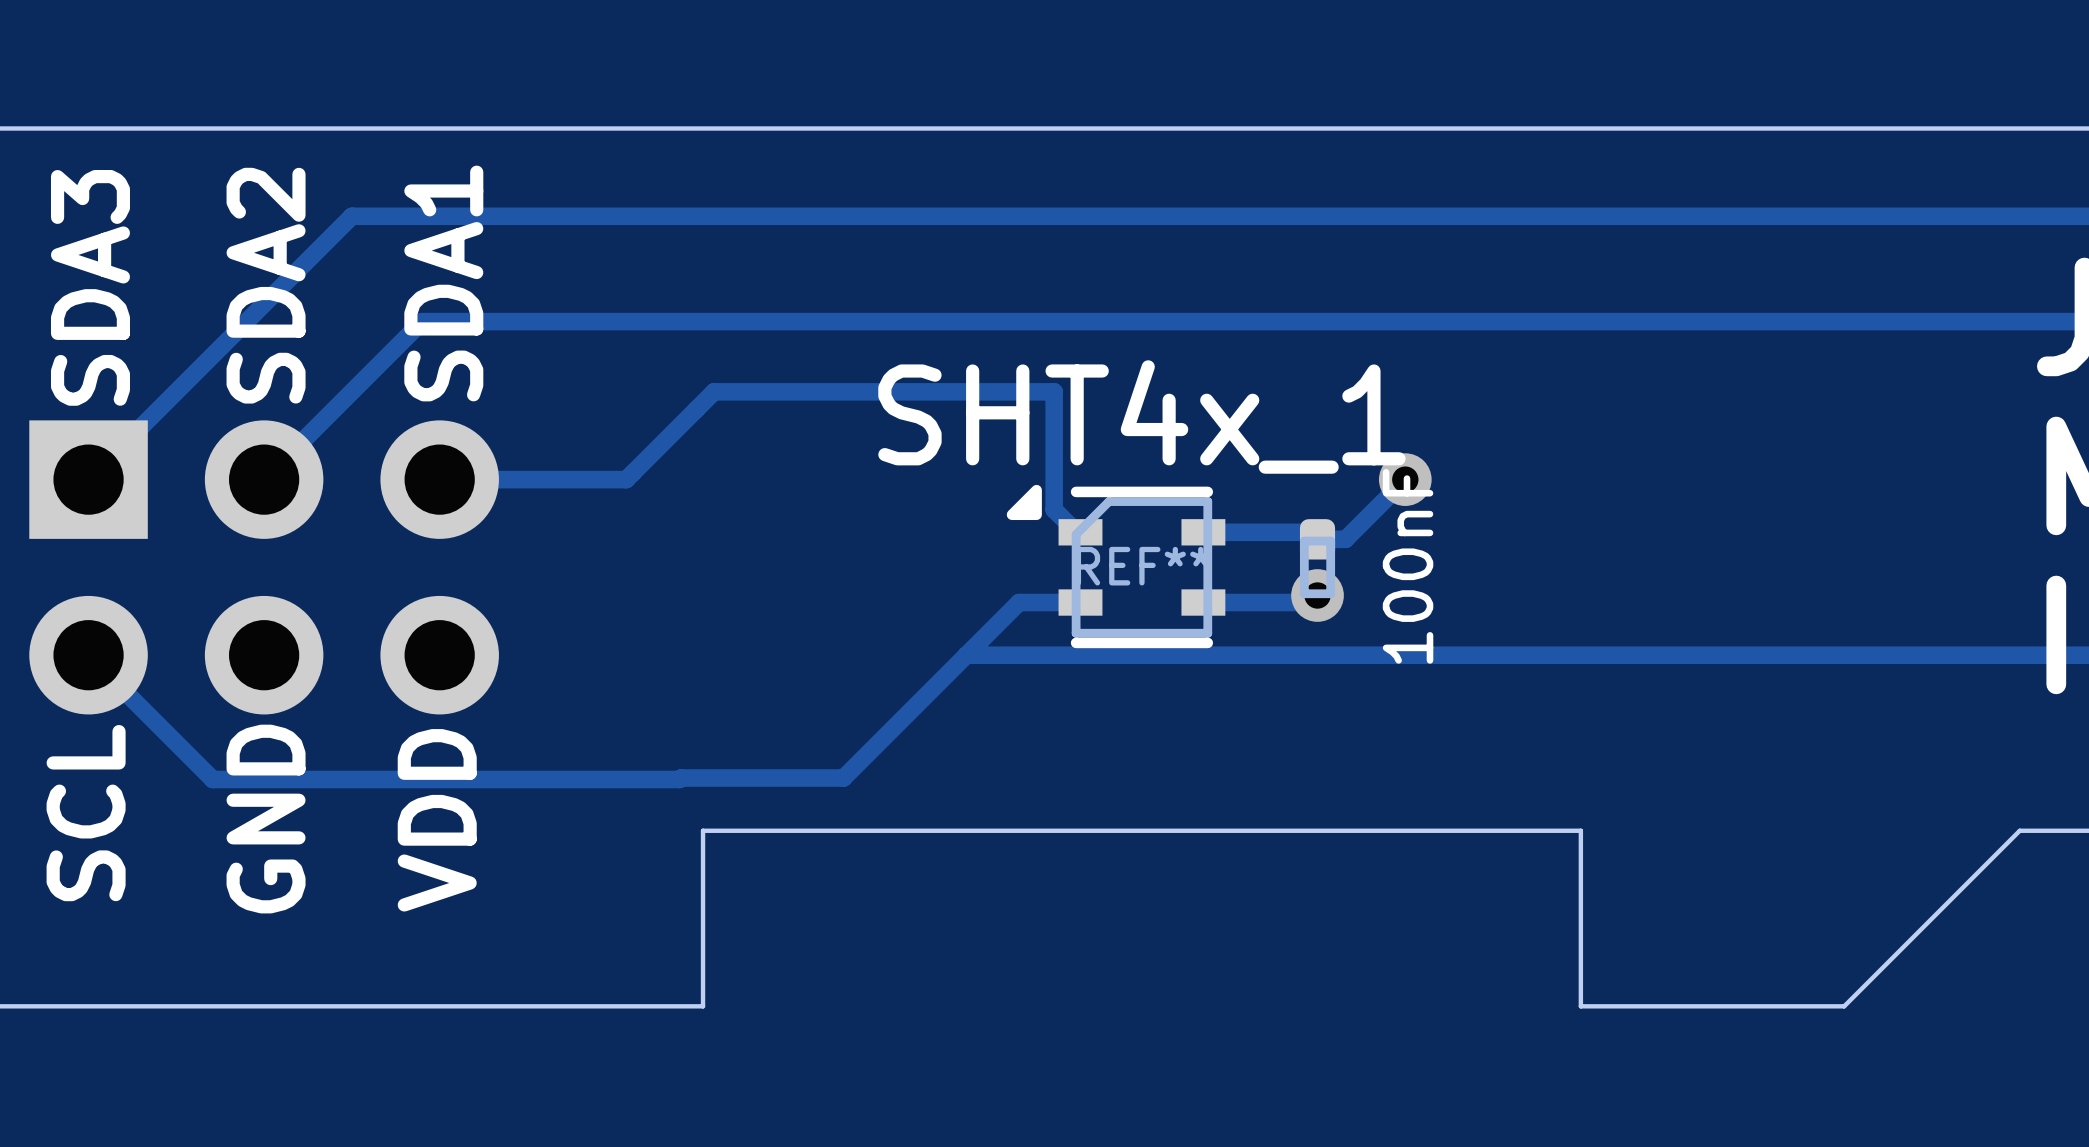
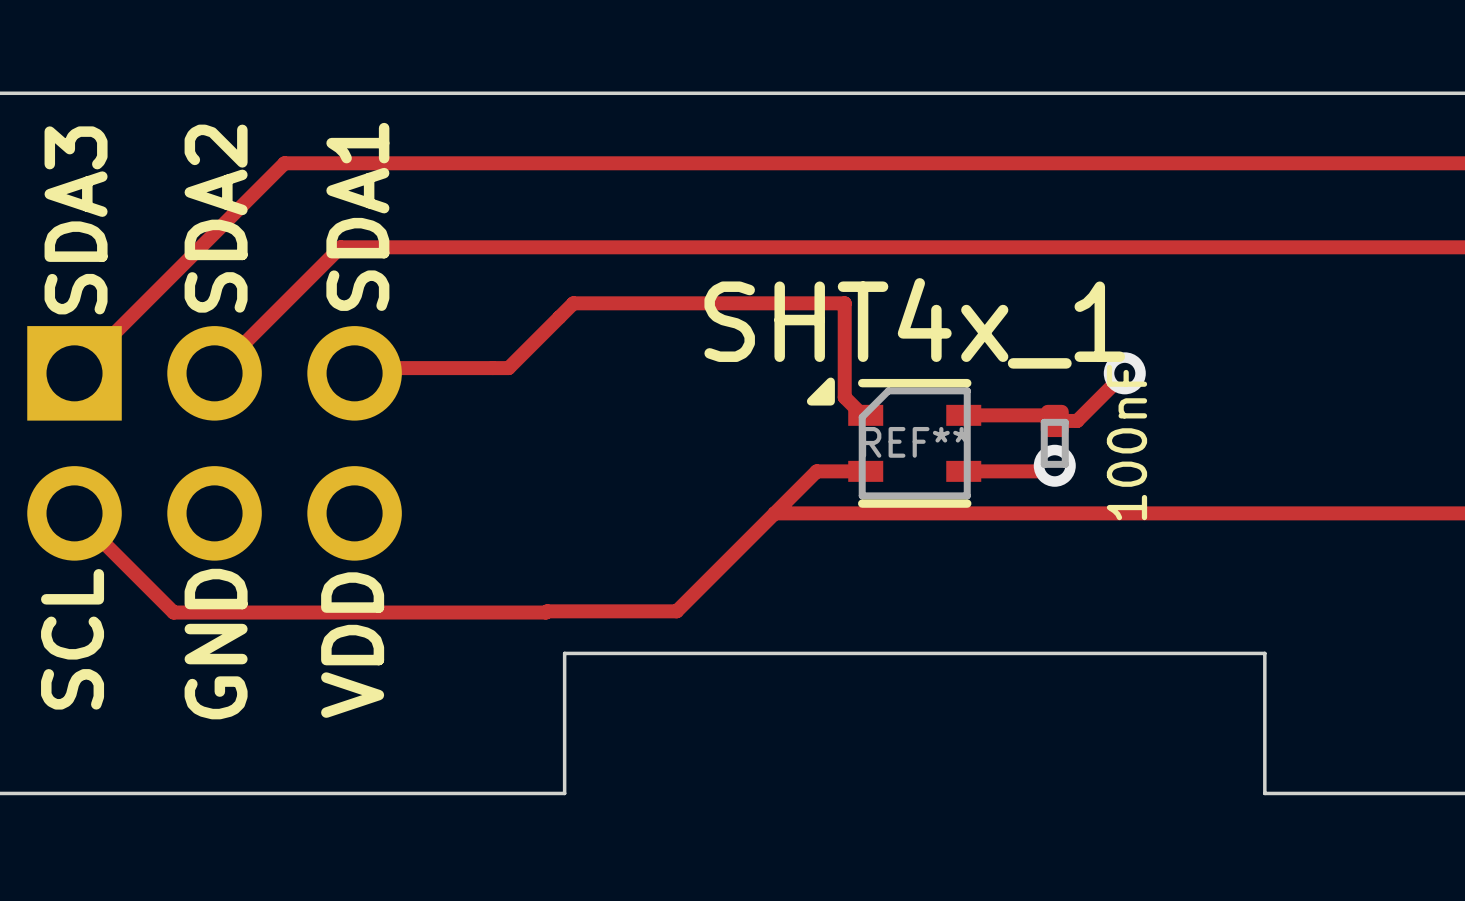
track: (632, 473) (626, 479) (439, 479) -> (508, 368) (387, 368)

